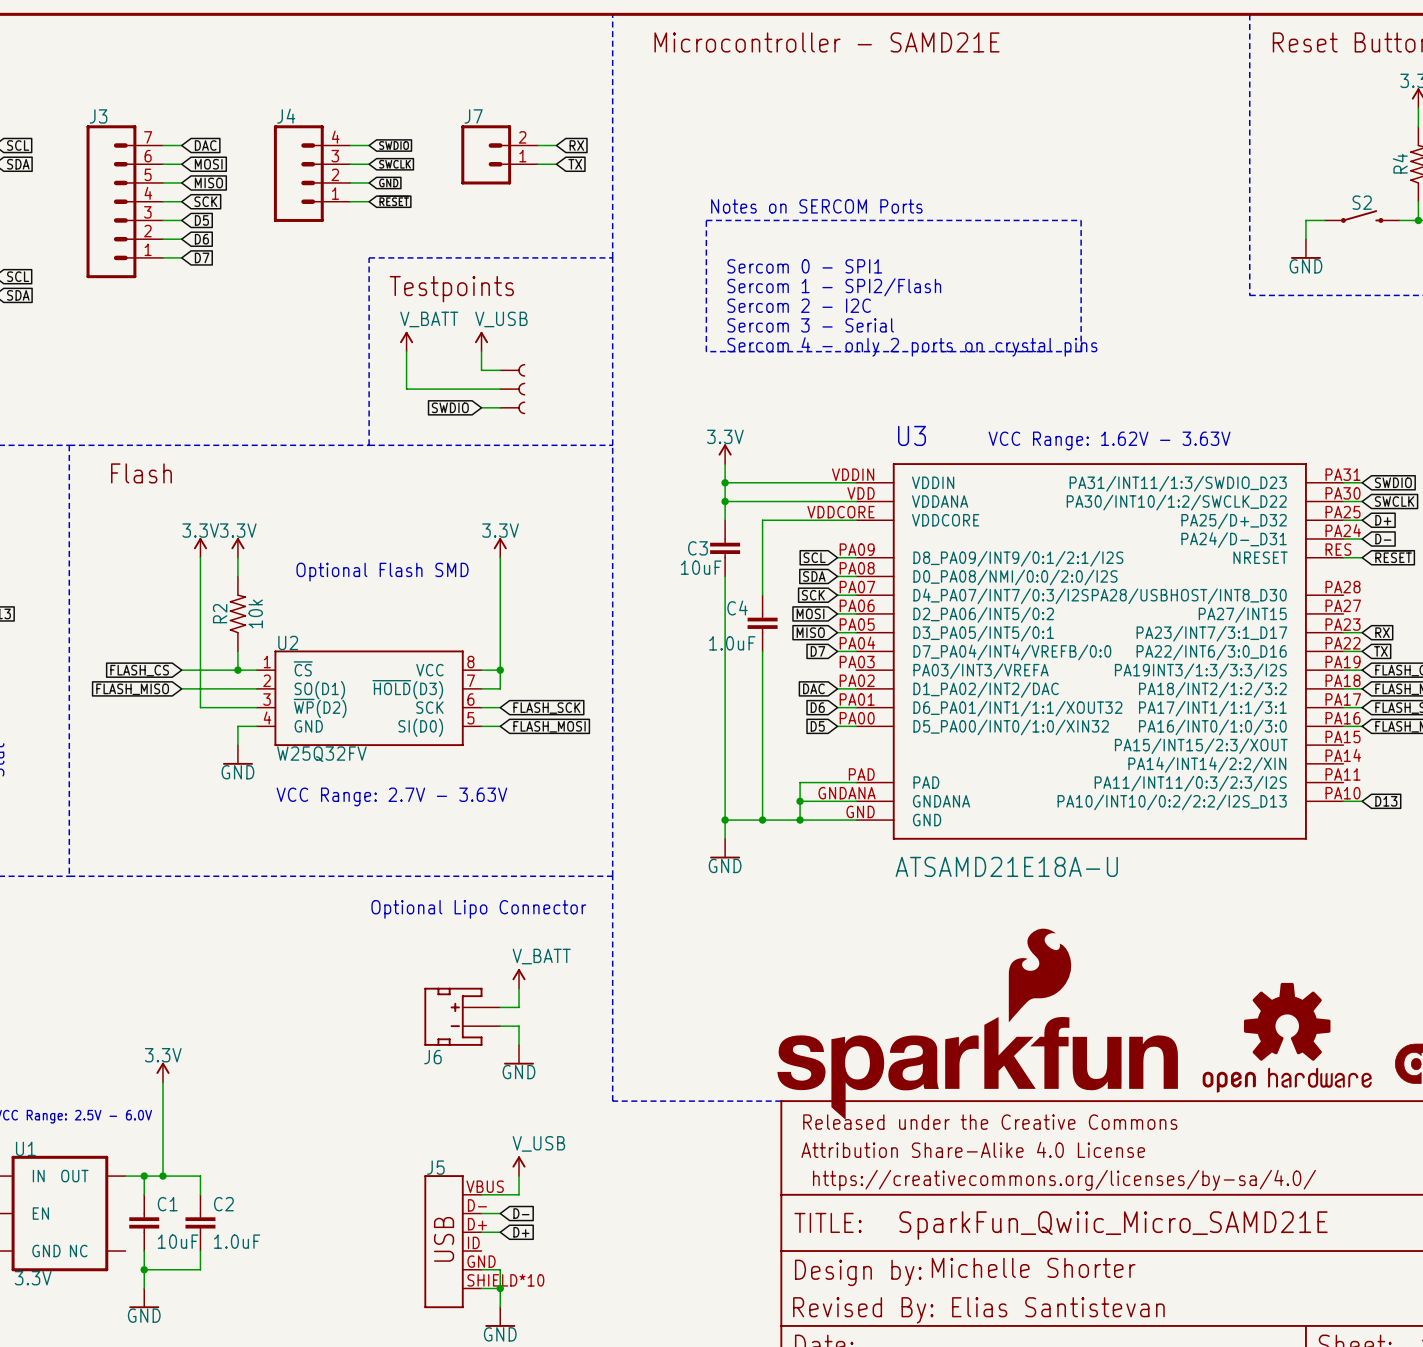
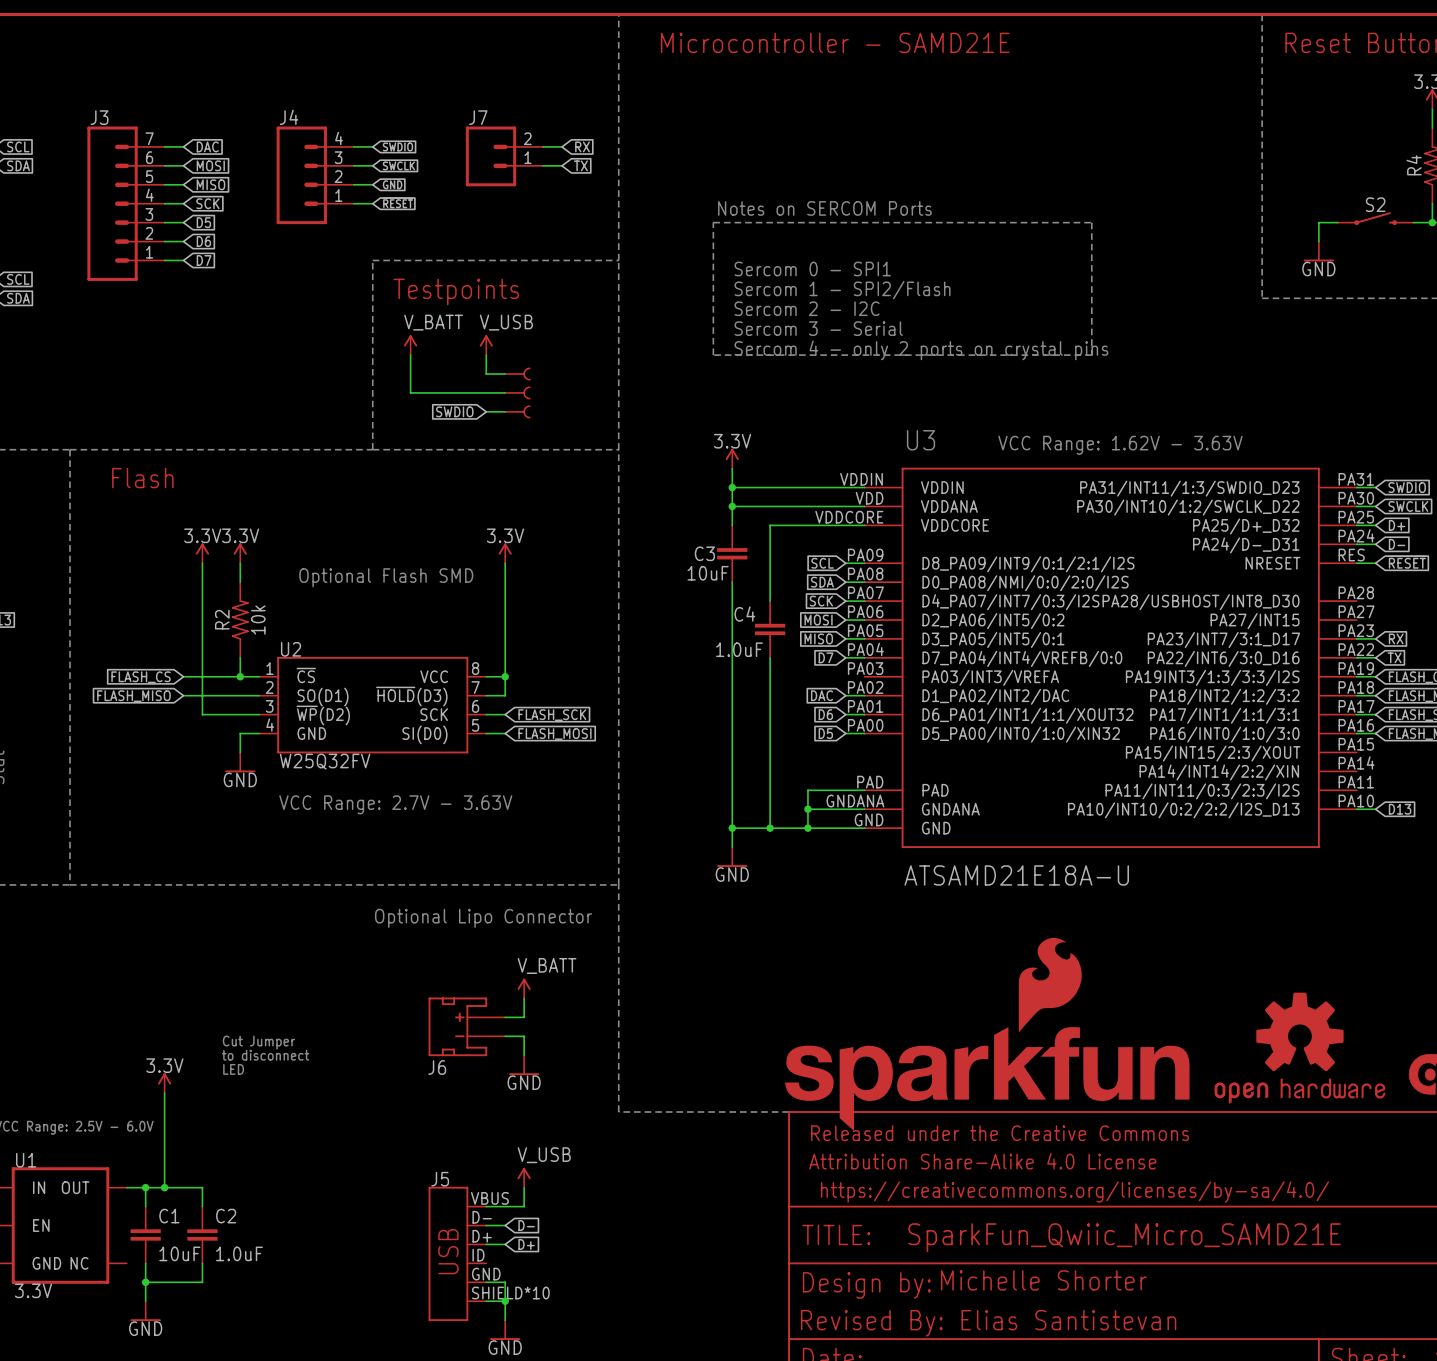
text: none -> Cut Jumper (258, 1042)
text: none -> to disconnect (265, 1055)
text: none -> LED (233, 1069)

